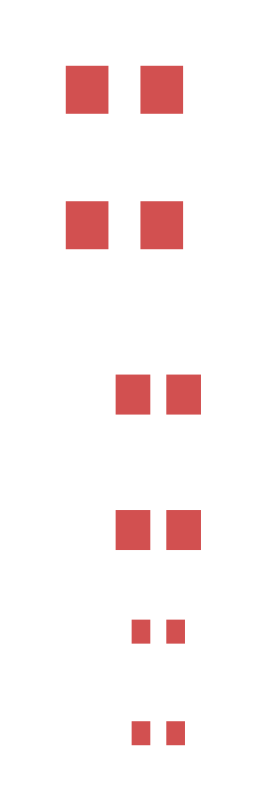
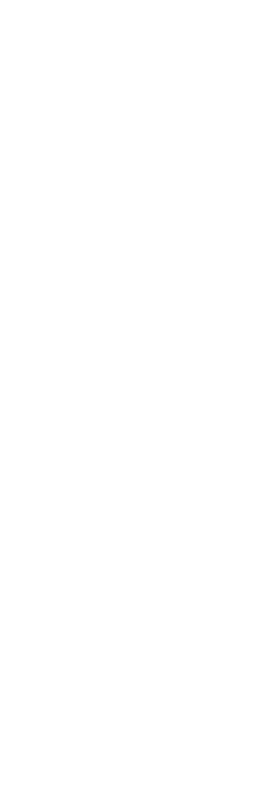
part: (124, 89) -> none
part: (124, 225) -> none
part: (158, 394) -> none
part: (158, 530) -> none
part: (158, 631) -> none
part: (158, 733) -> none

